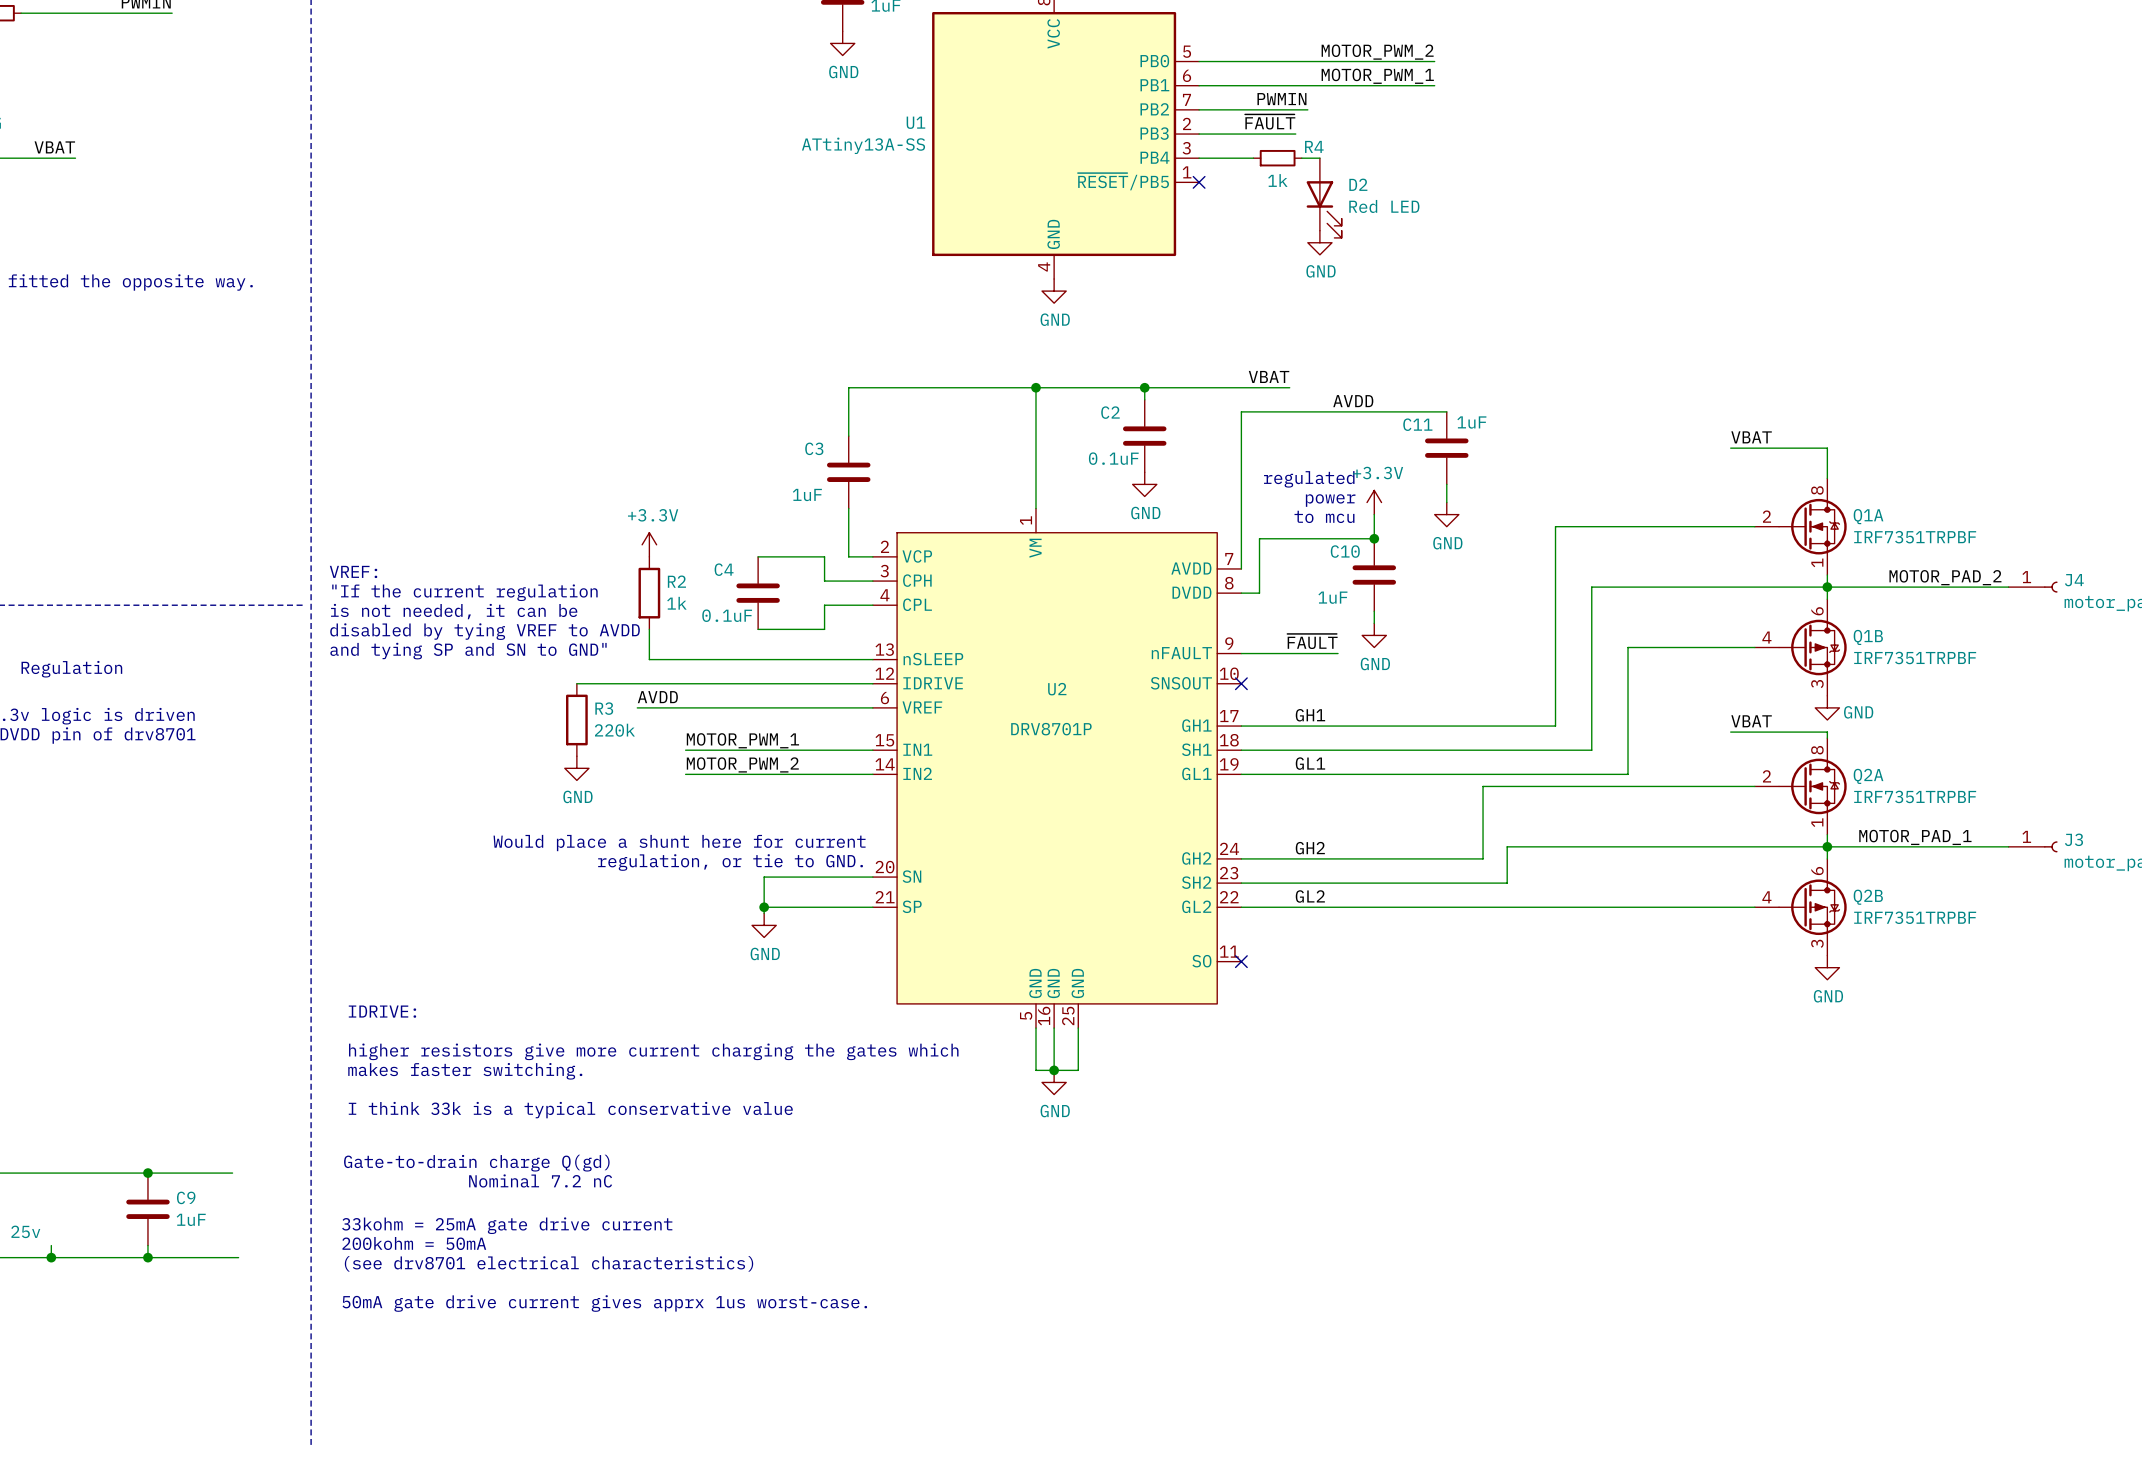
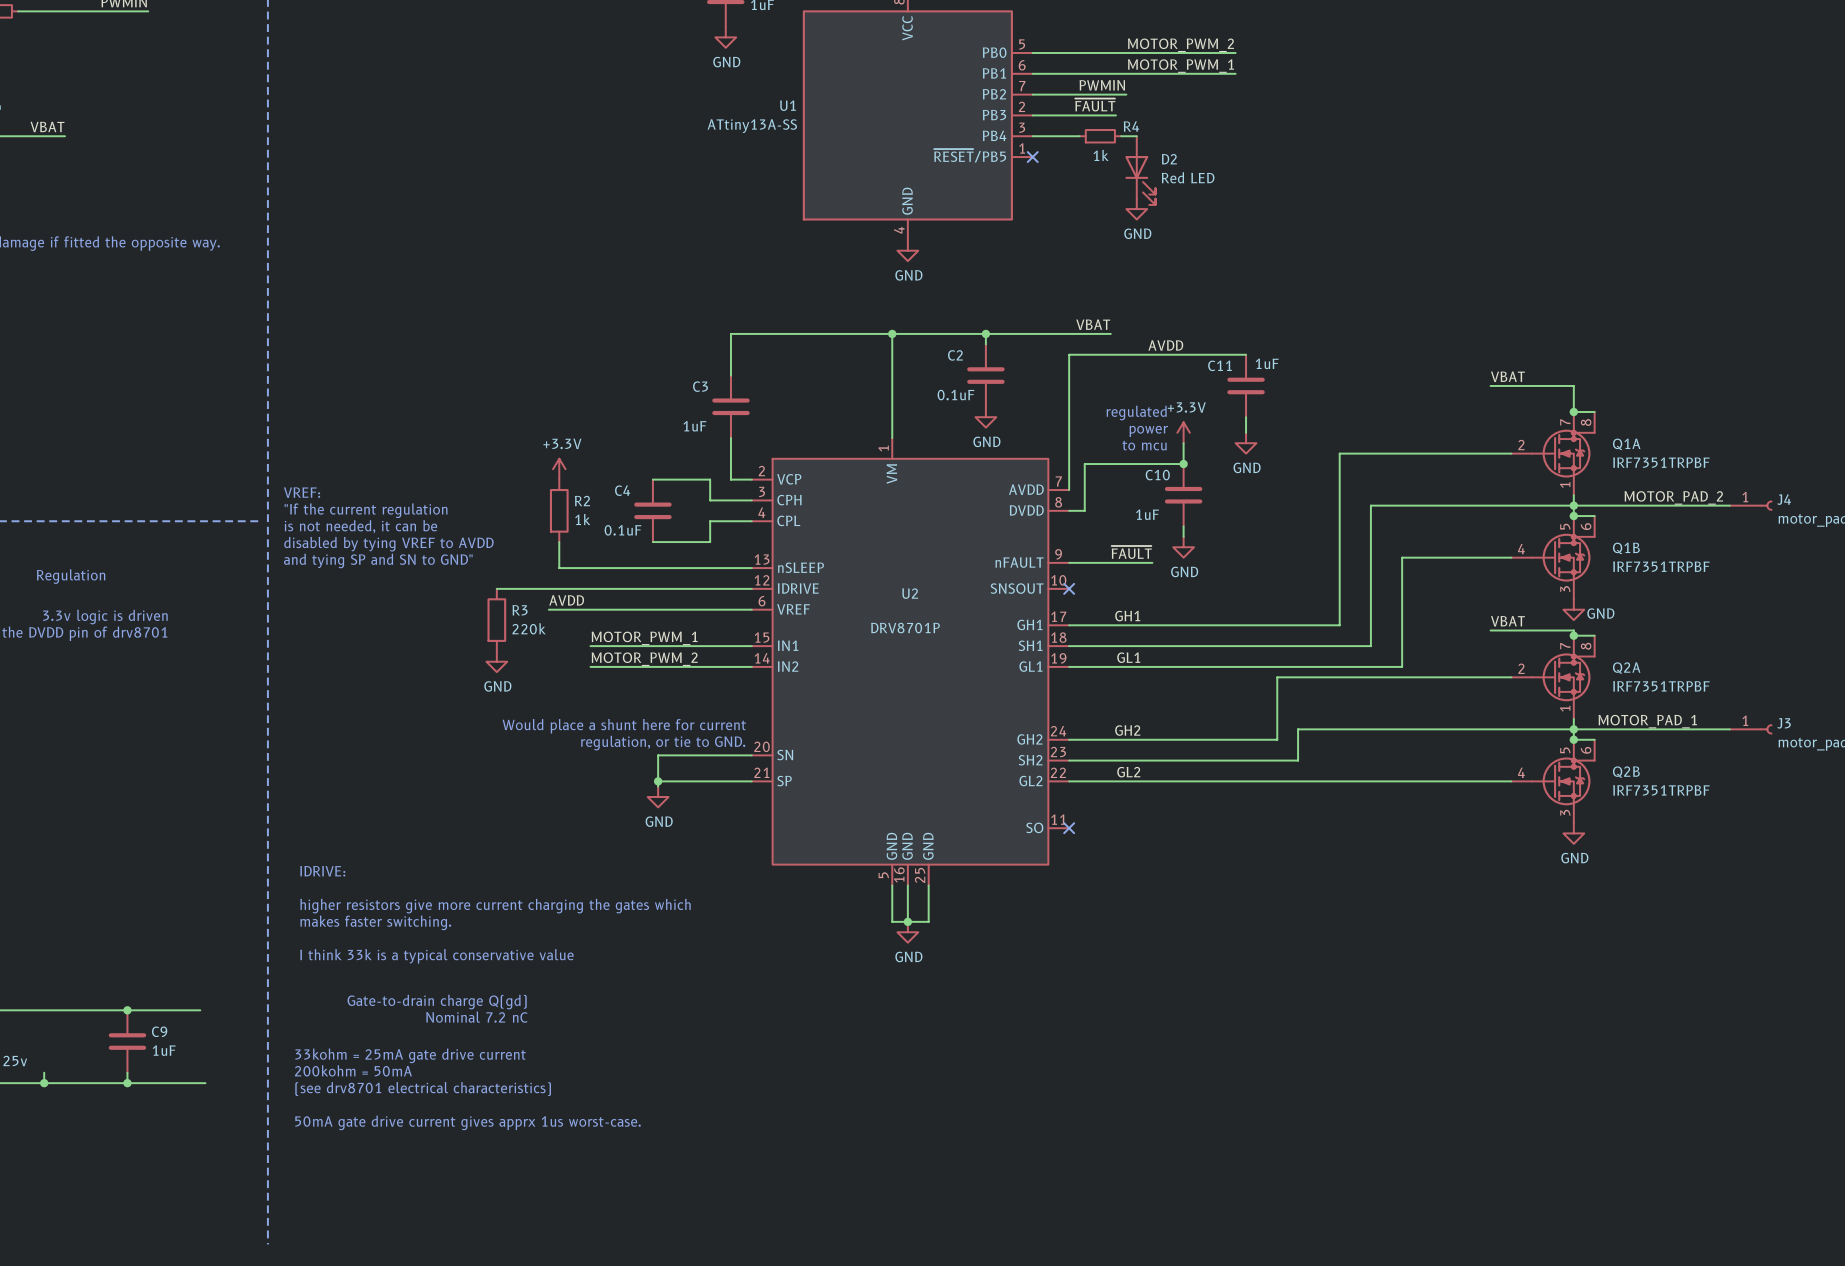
Q1A symbol: [1754, 478, 1847, 576] -> [1511, 411, 1595, 496]
wire: none -> (1573, 411) (1594, 411)
junction: none -> (1573, 411)
Q1B symbol: [1754, 599, 1847, 696] -> [1511, 516, 1595, 600]
wire: none -> (1573, 516) (1594, 516)
junction: none -> (1573, 516)
Q2A symbol: [1754, 738, 1847, 835] -> [1511, 635, 1595, 719]
wire: none -> (1573, 635) (1594, 635)
junction: none -> (1573, 635)
Q2B symbol: [1754, 858, 1847, 956] -> [1511, 739, 1595, 824]
wire: none -> (1573, 739) (1594, 739)
junction: none -> (1573, 739)

